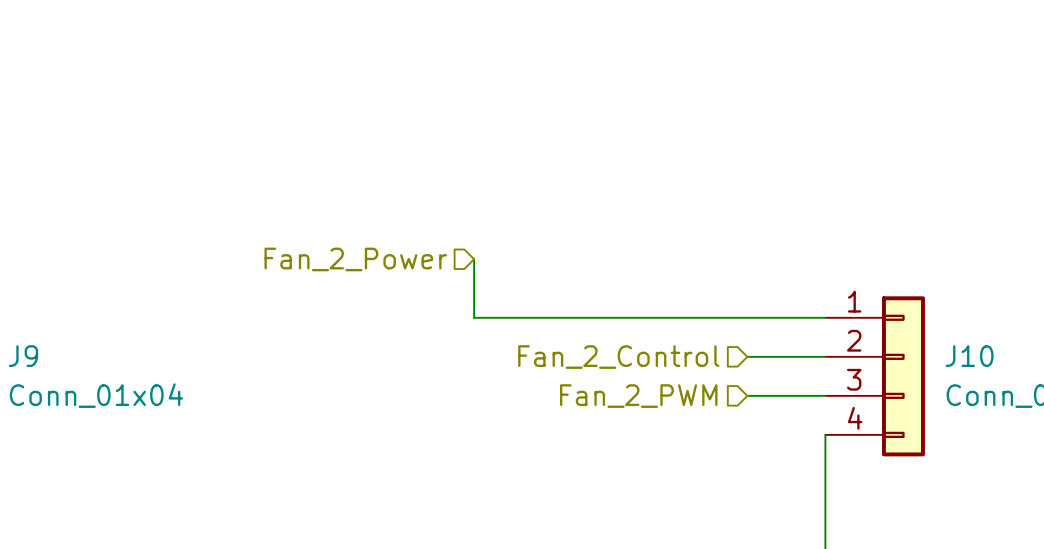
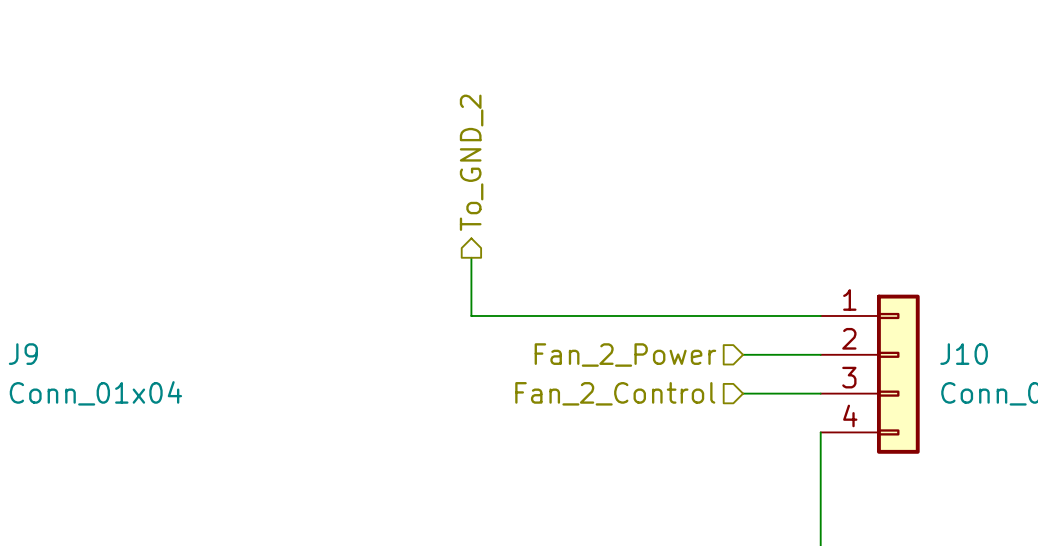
hierarchical label: none -> To_GND_2 (471, 162)
hierarchical label: Fan_2_Power (355, 259) -> none
hierarchical label: Fan_2_Control (618, 357) -> Fan_2_Power (625, 355)
hierarchical label: Fan_2_PWM (638, 396) -> Fan_2_Control (615, 393)

